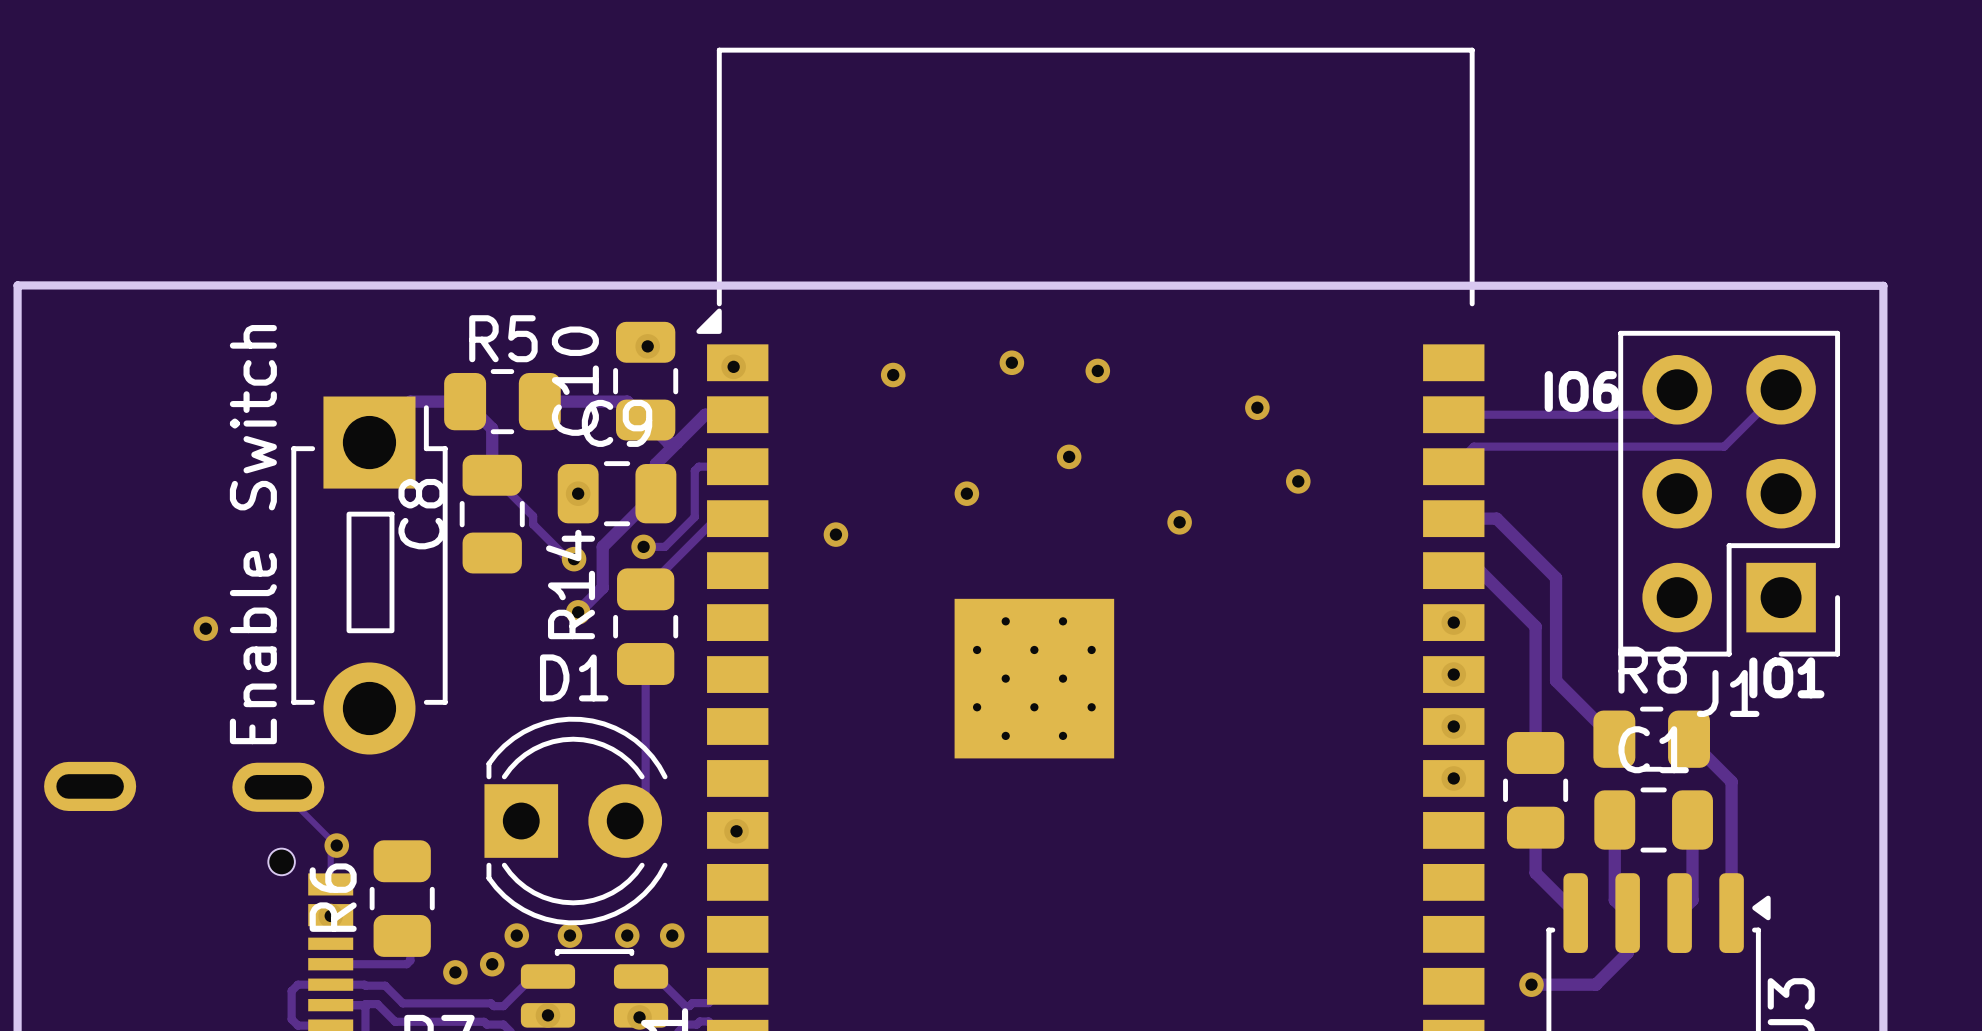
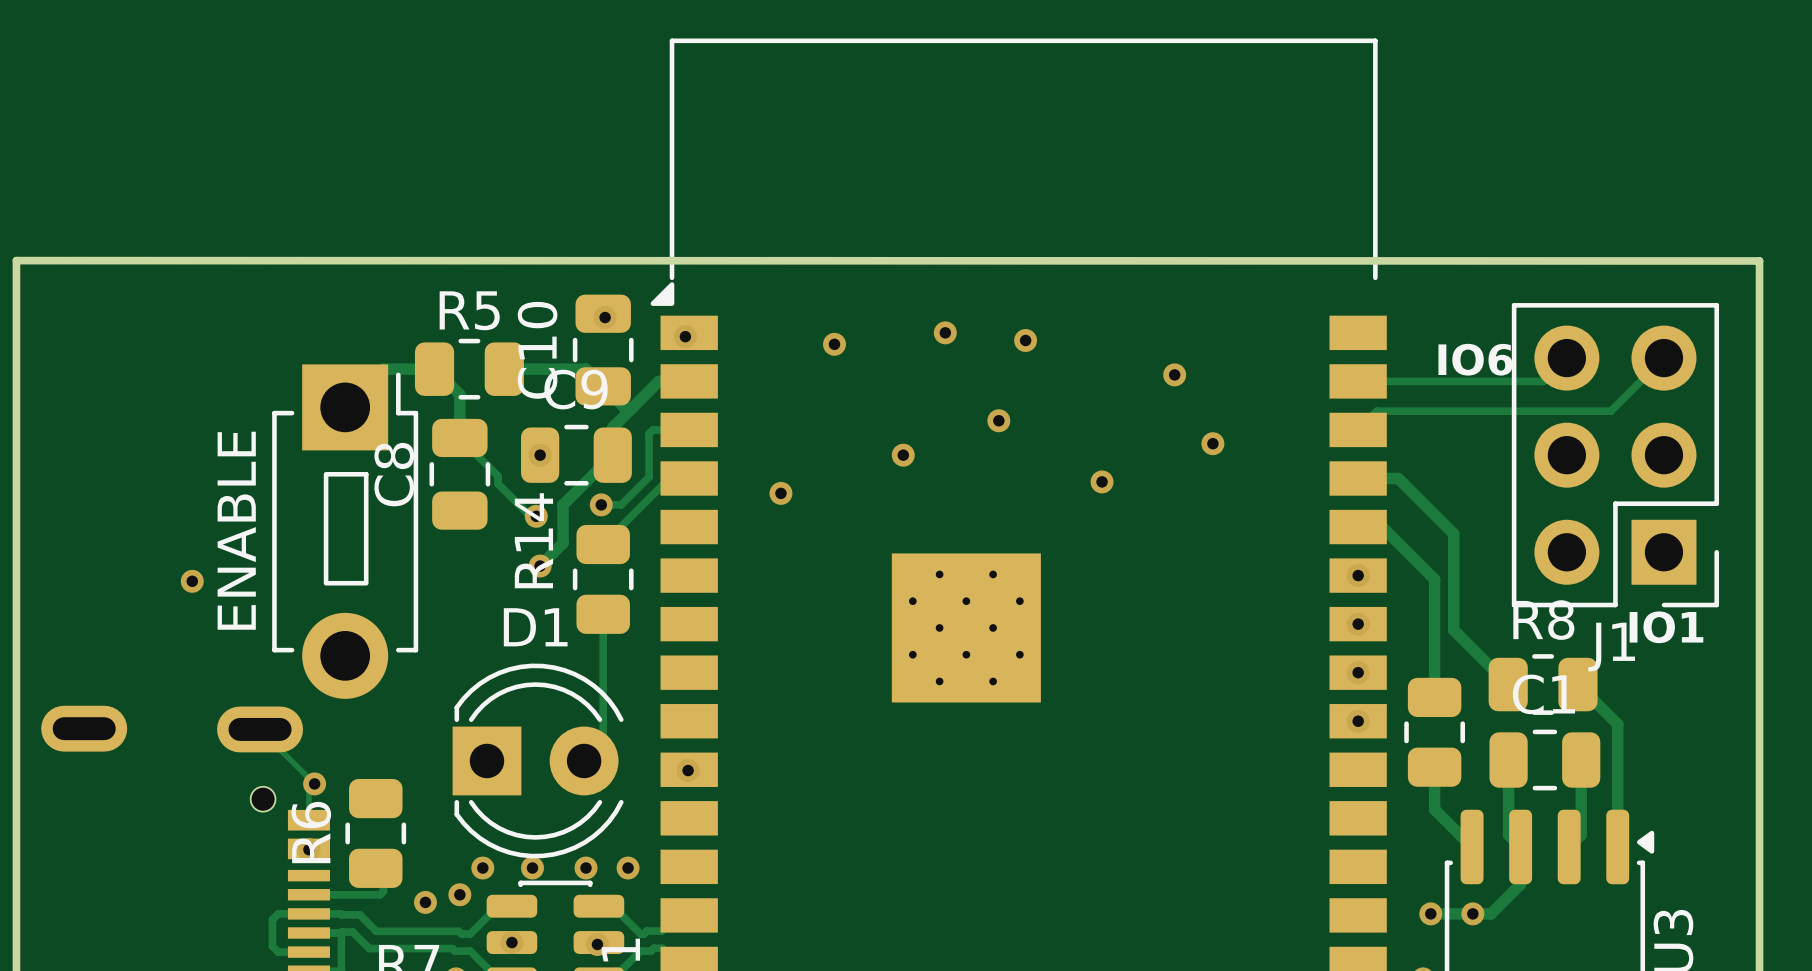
Enable Switch name: Enable Switch (253, 534) -> none
Enable Switch value: none -> ENABLE (236, 530)
via: none -> (1472, 913)

